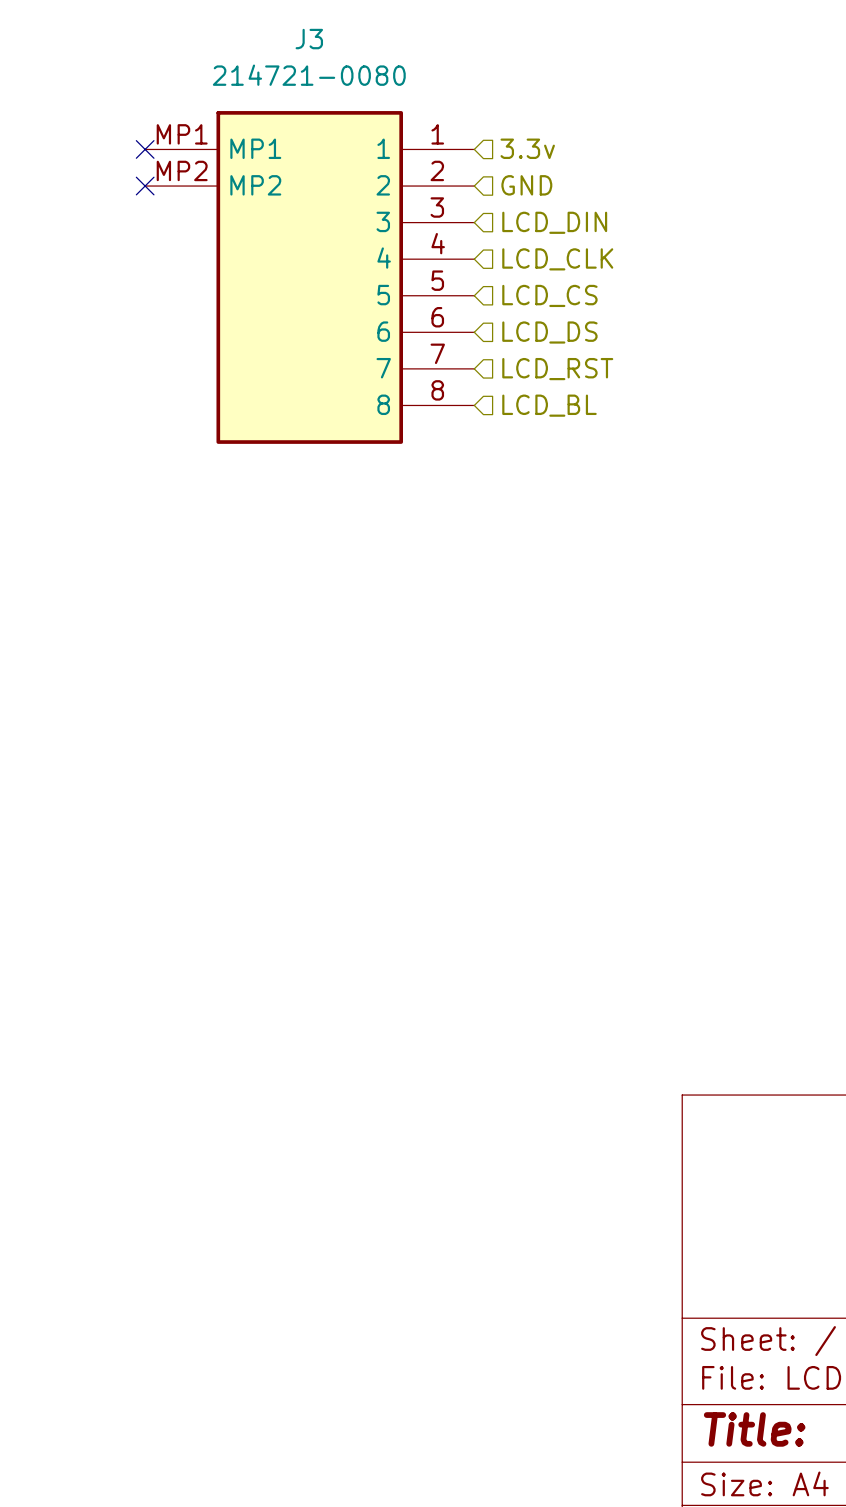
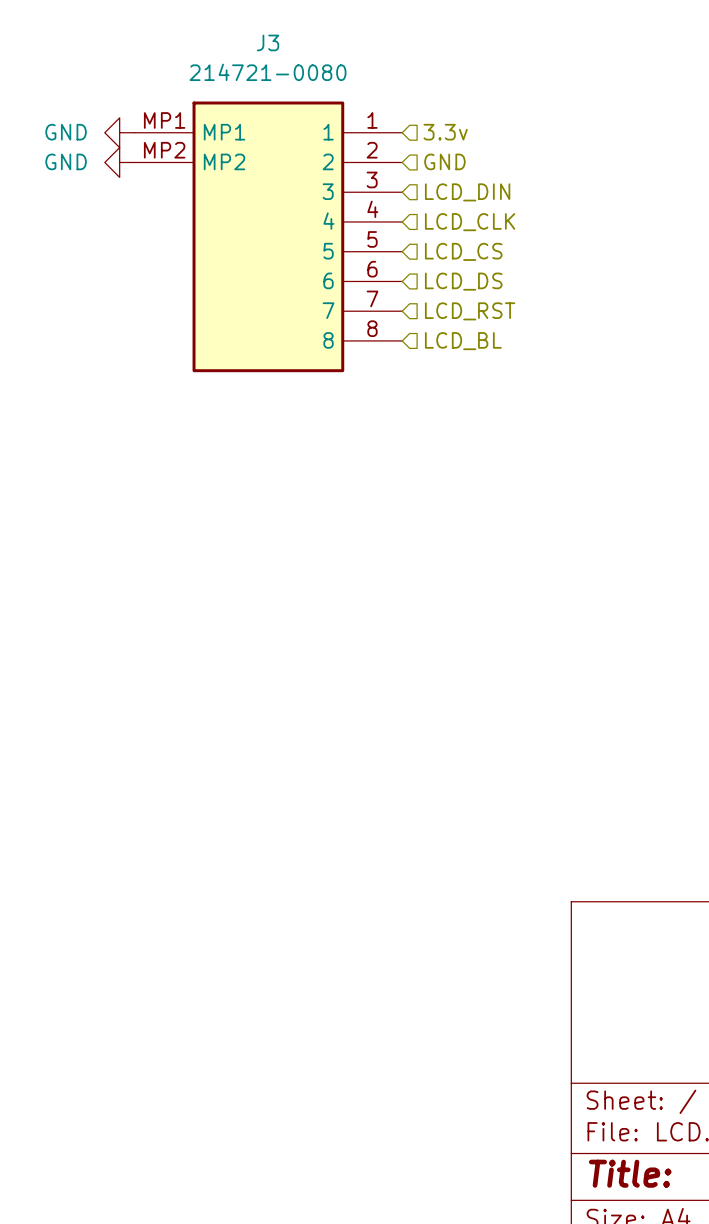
power symbol: none -> GND (119, 132)
no-connect mark: (145, 149) -> none
power symbol: none -> GND (119, 162)
no-connect mark: (145, 186) -> none

